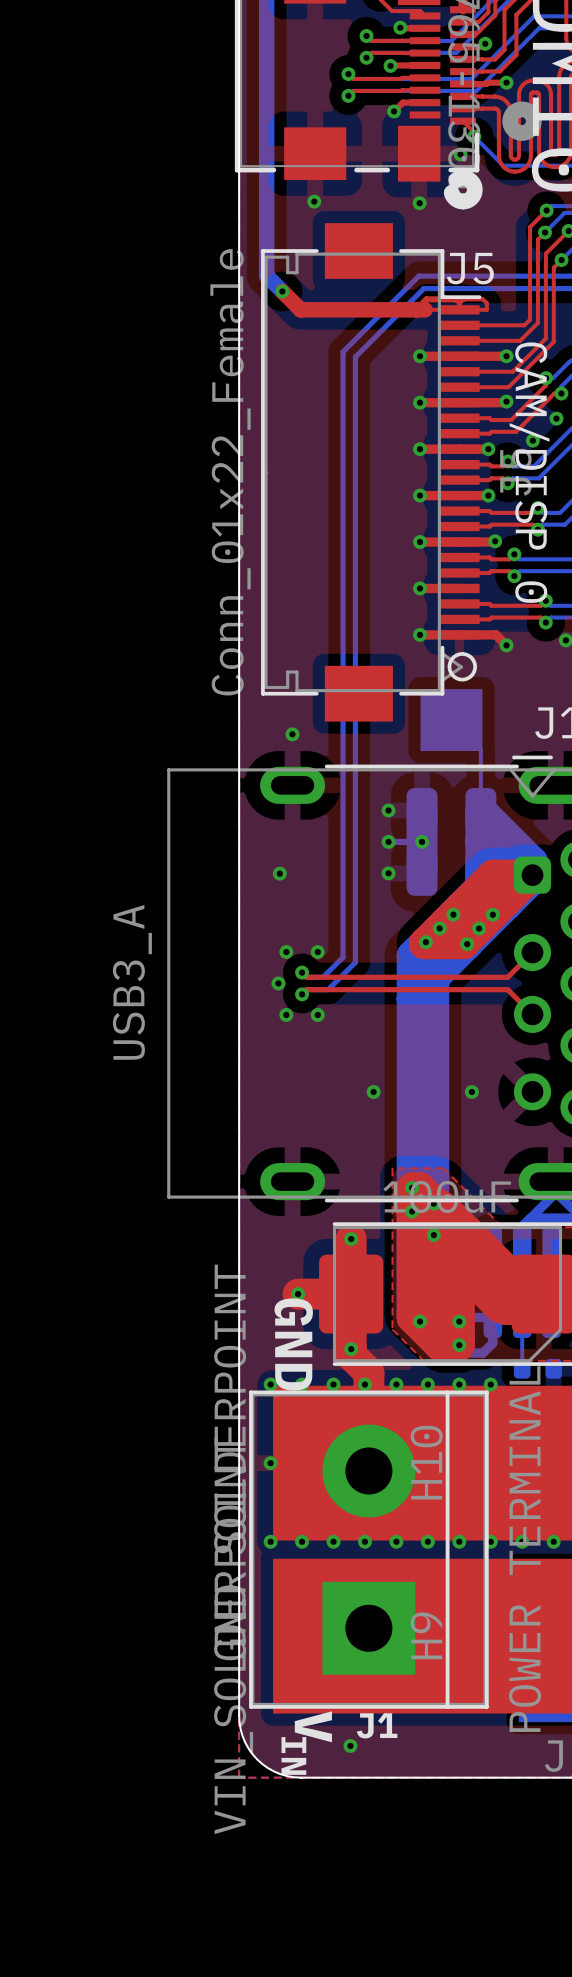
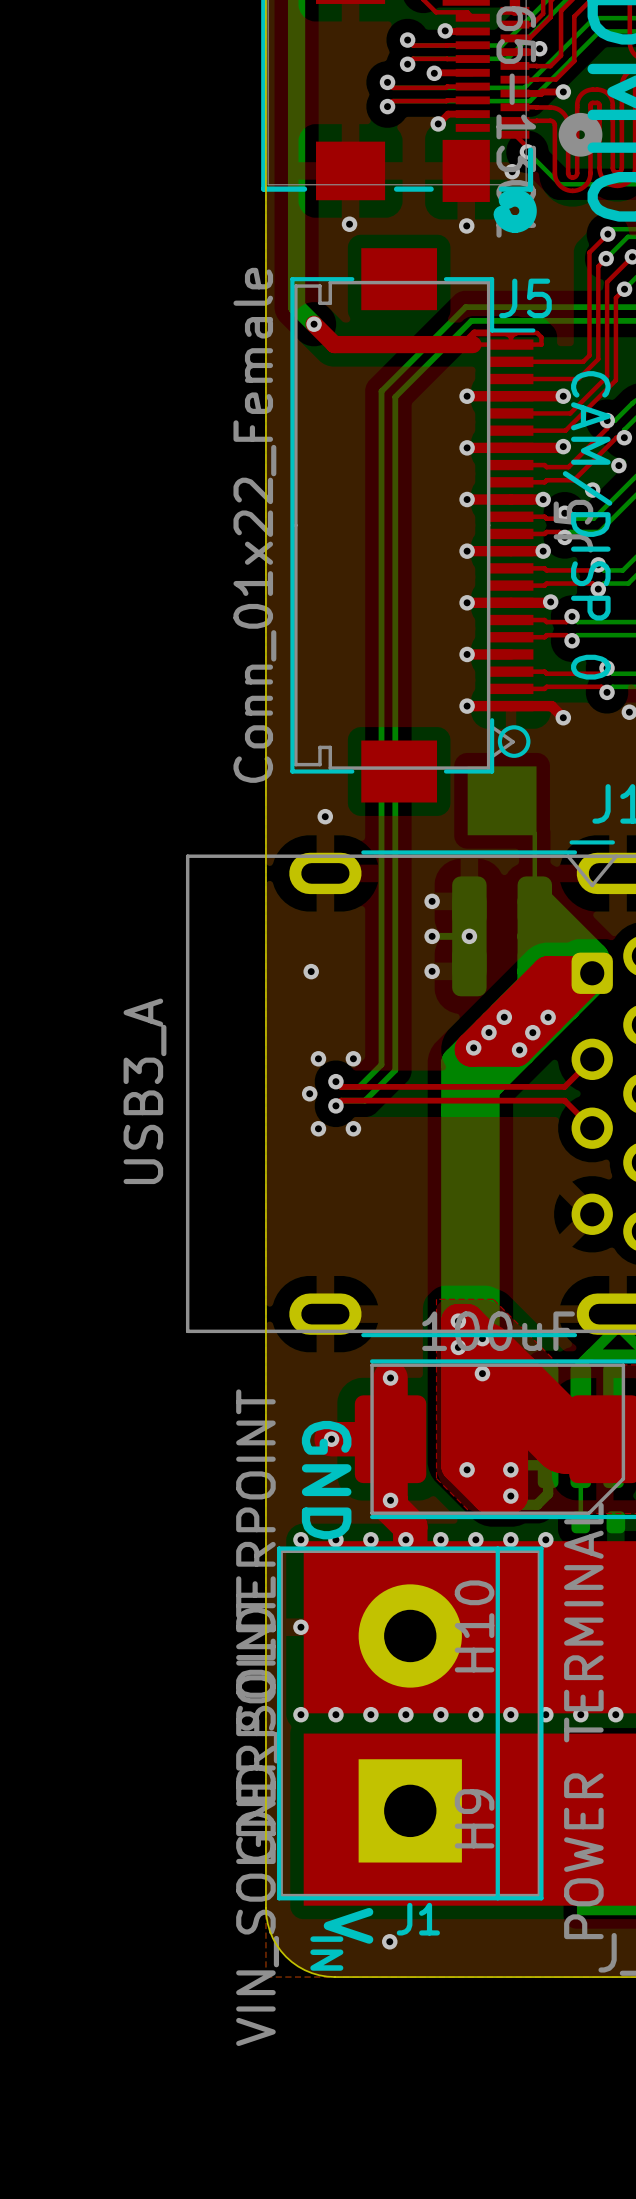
via: (373, 1092) -> none
via: (471, 1092) -> none

